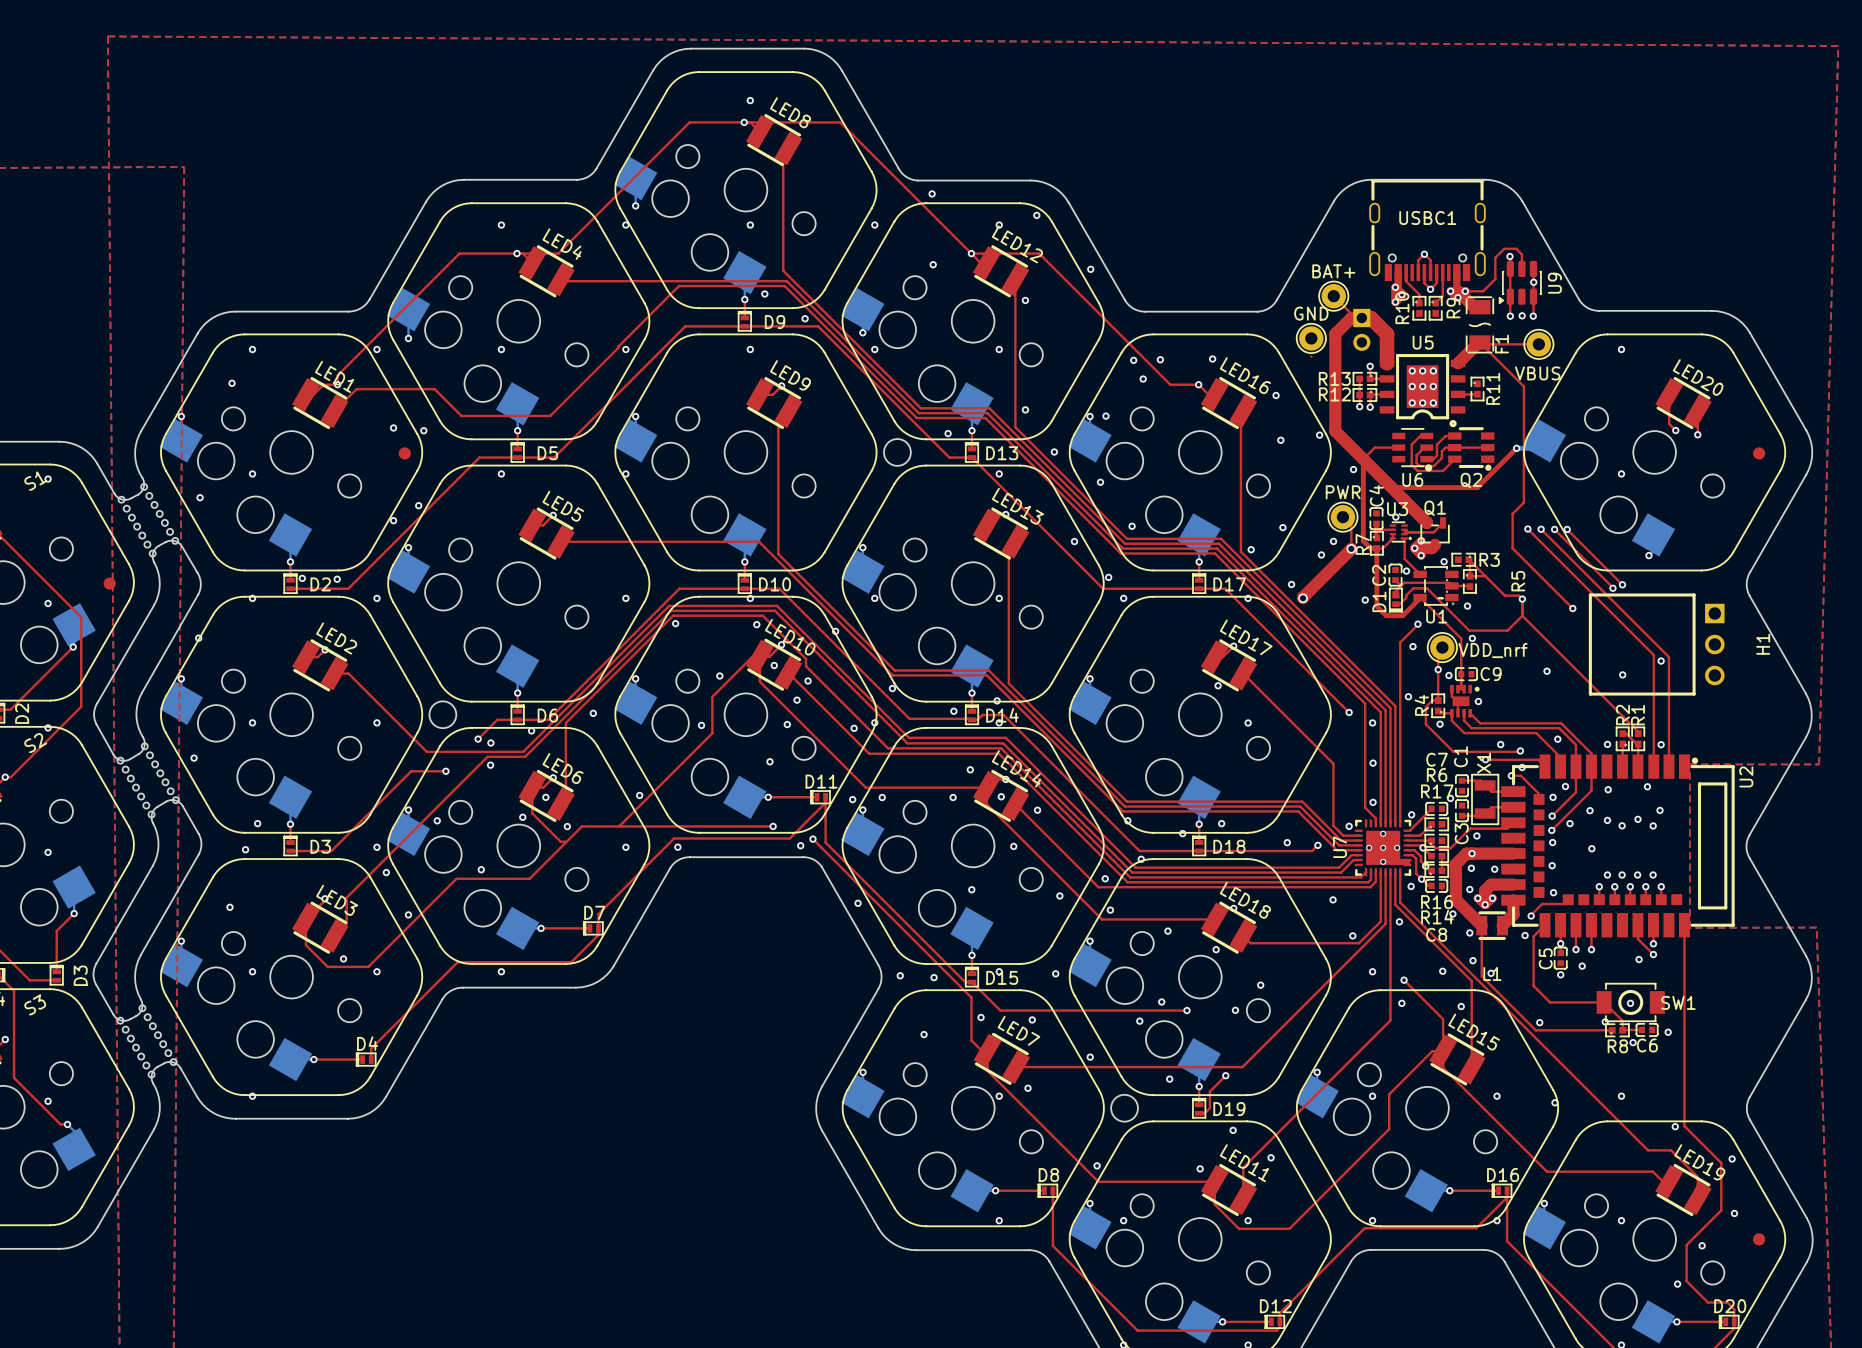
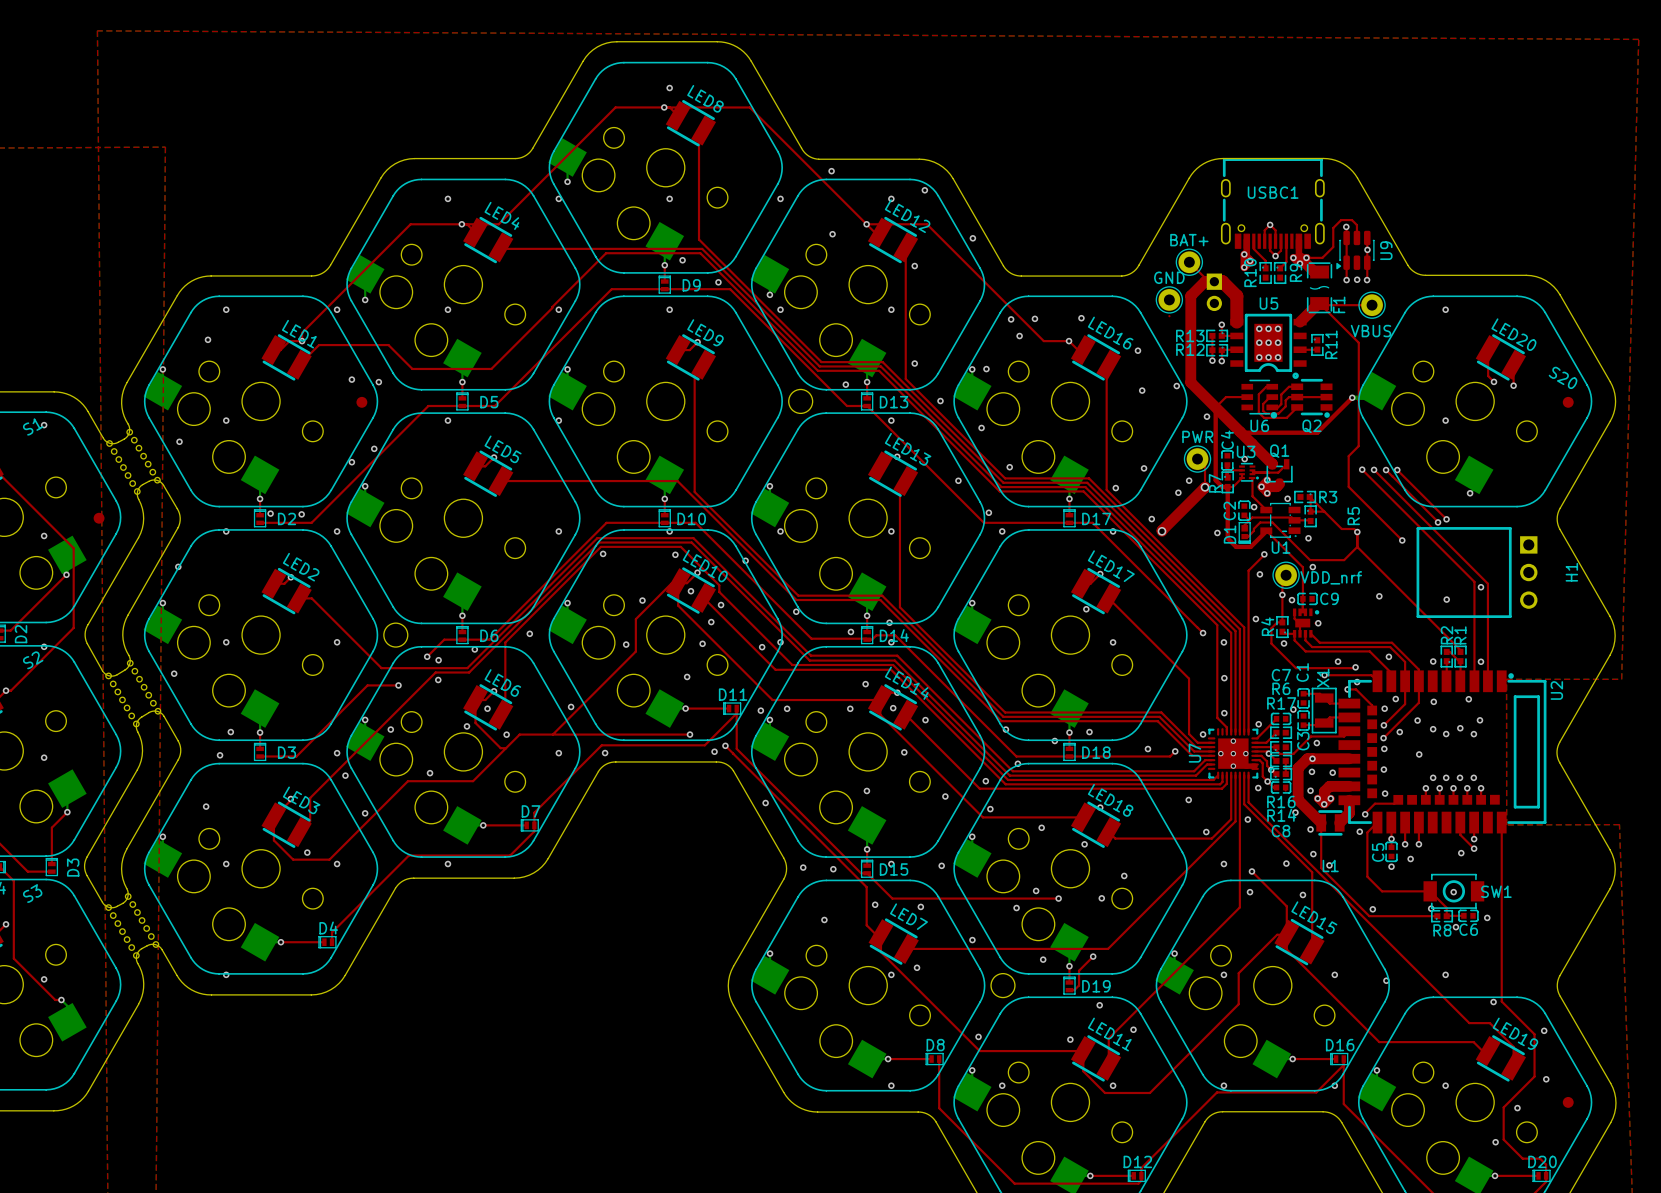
S20 name: none -> S20 (1563, 377)

